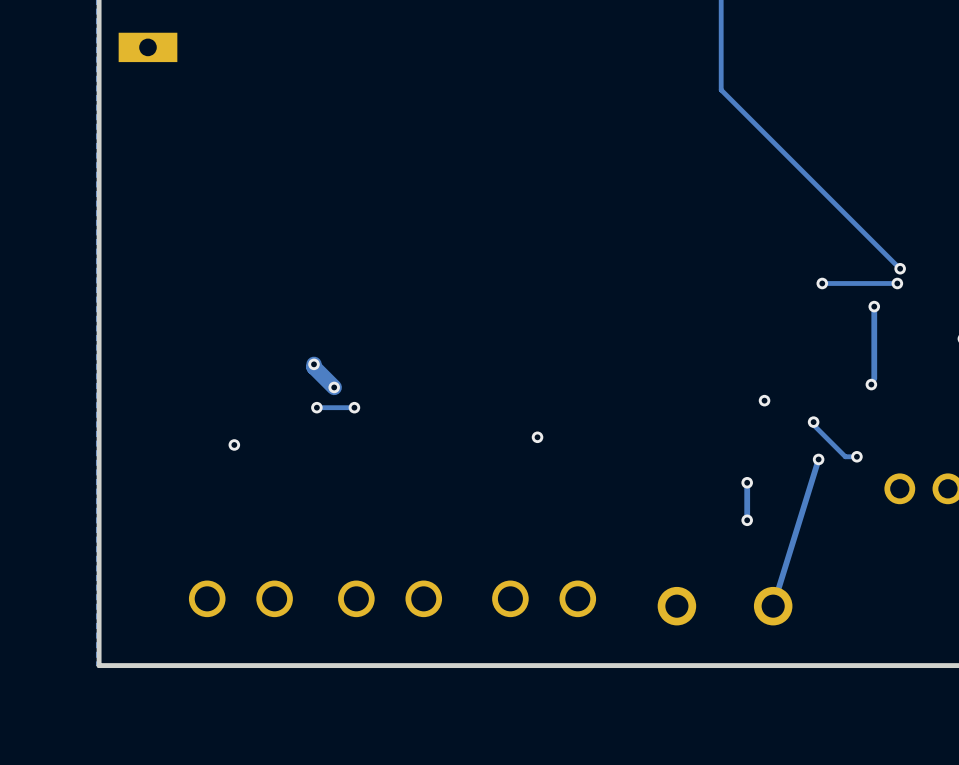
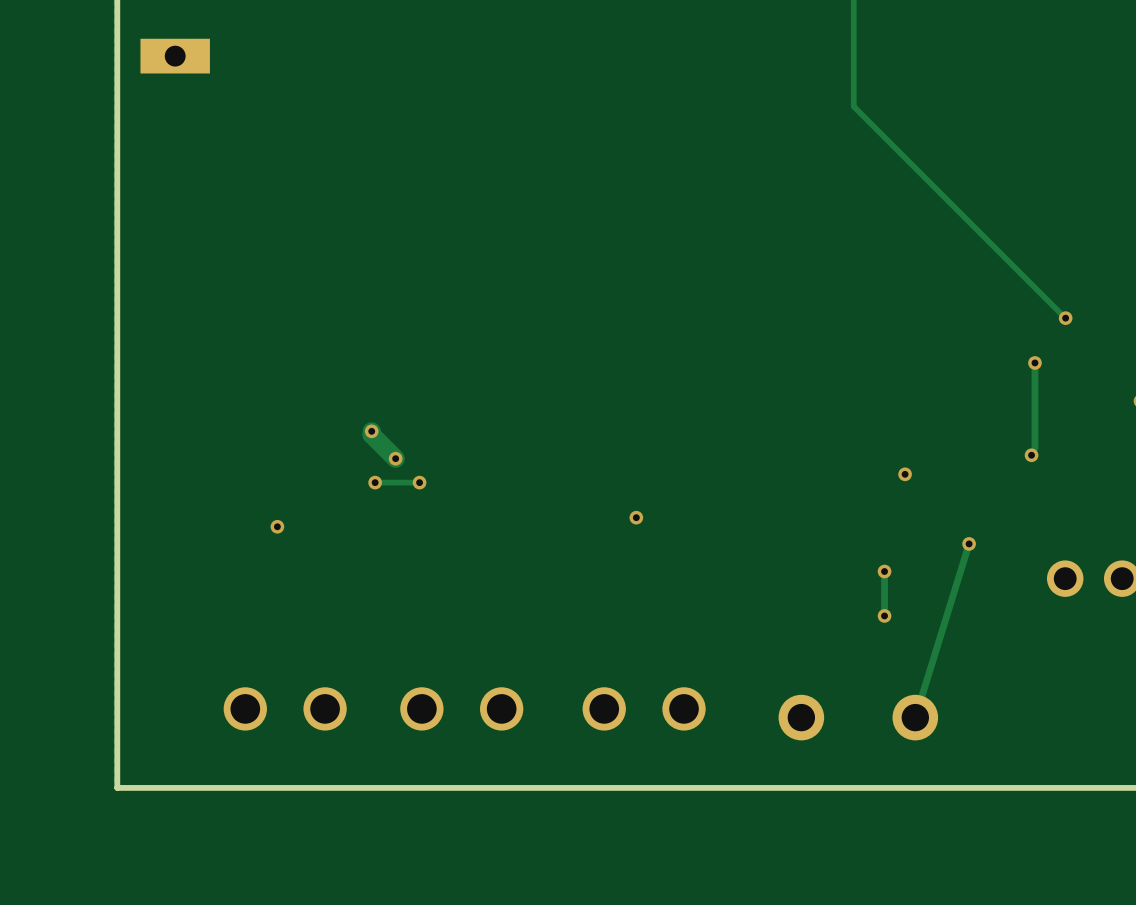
via: (822, 283) -> none
track: (897, 283) (822, 283) -> none
via: (897, 283) -> none
track: (813, 422) (813, 425) (845, 456) (856, 456) -> none
via: (813, 422) -> none
via: (856, 456) -> none

